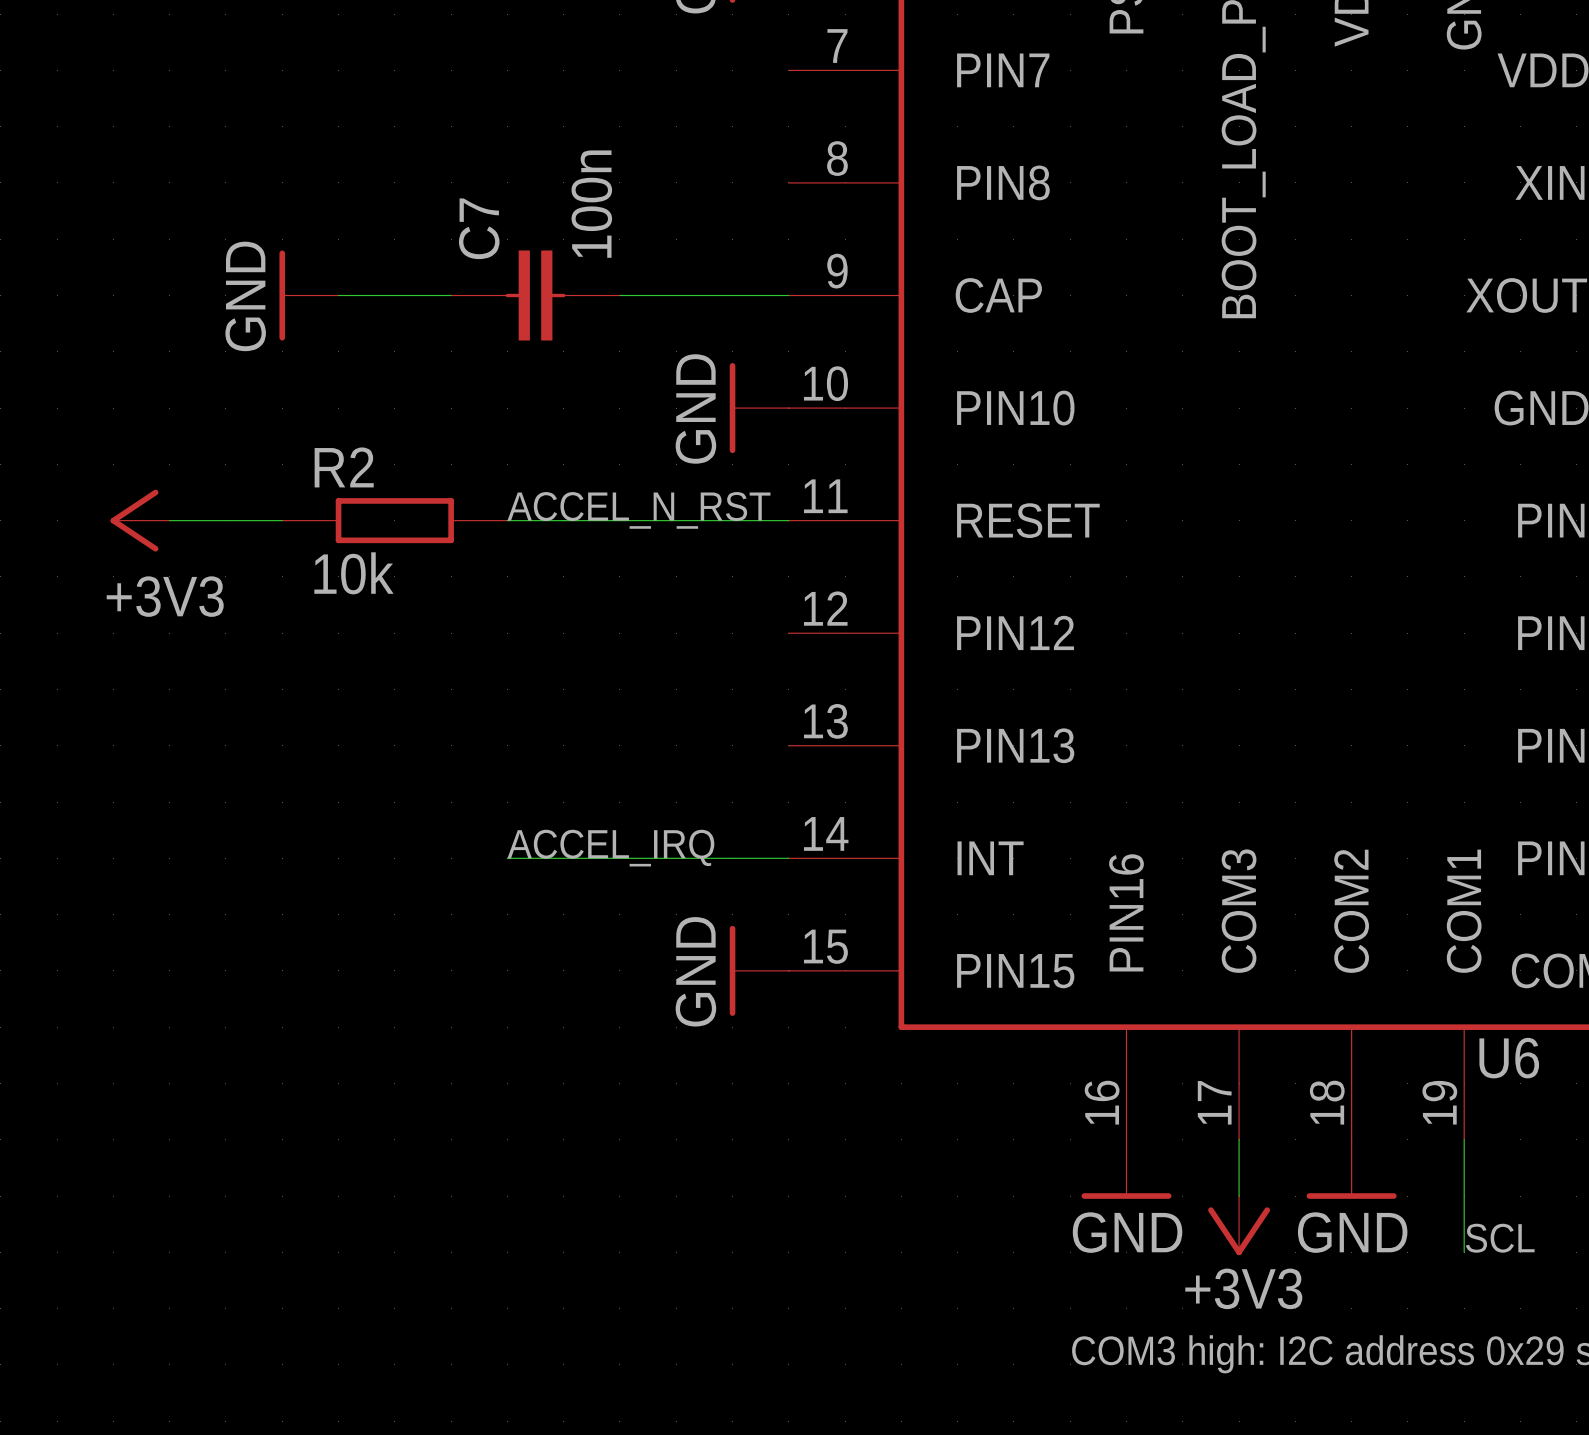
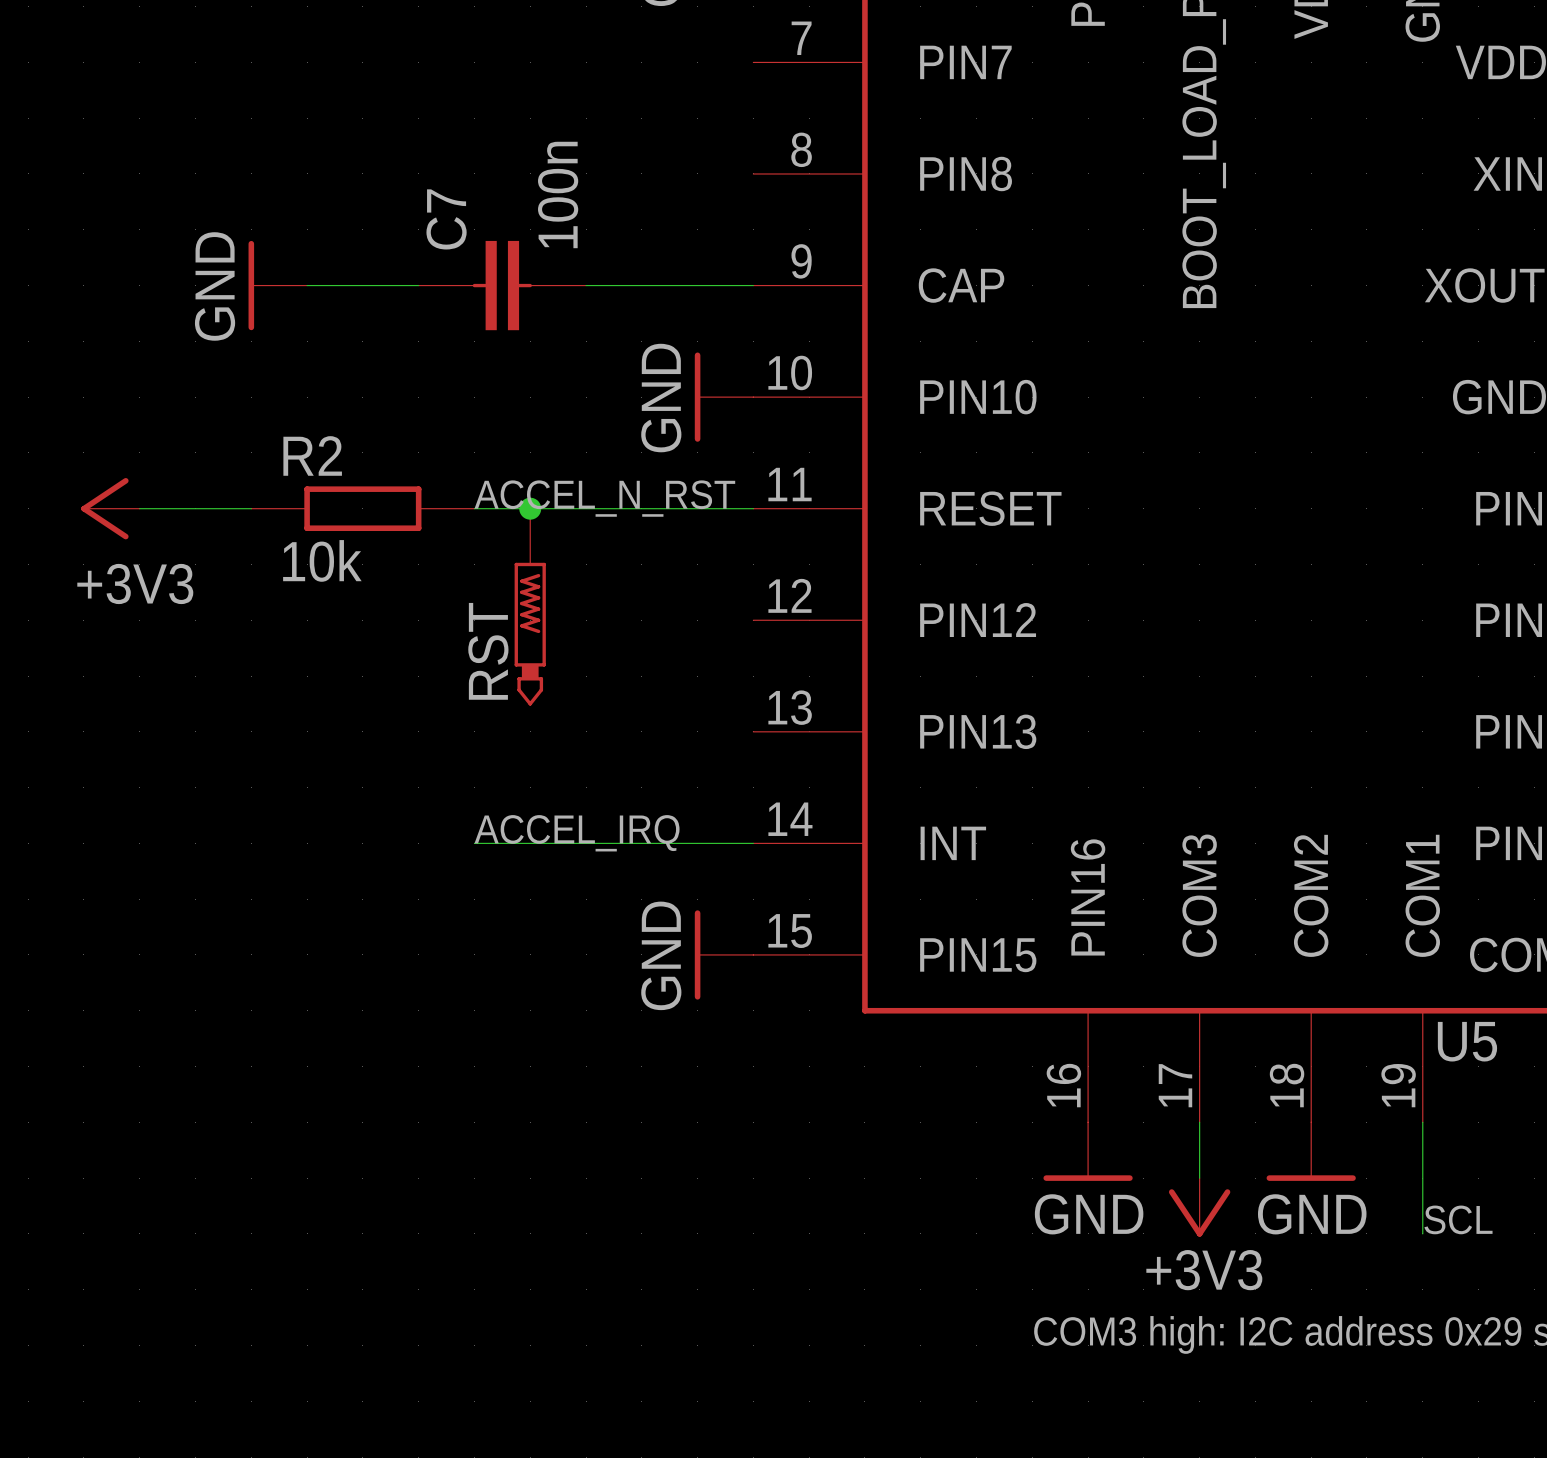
junction: none -> (530, 508)
RST: none -> (530, 607)
U6 name: U6 (1509, 1058) -> U5 (1467, 1041)

